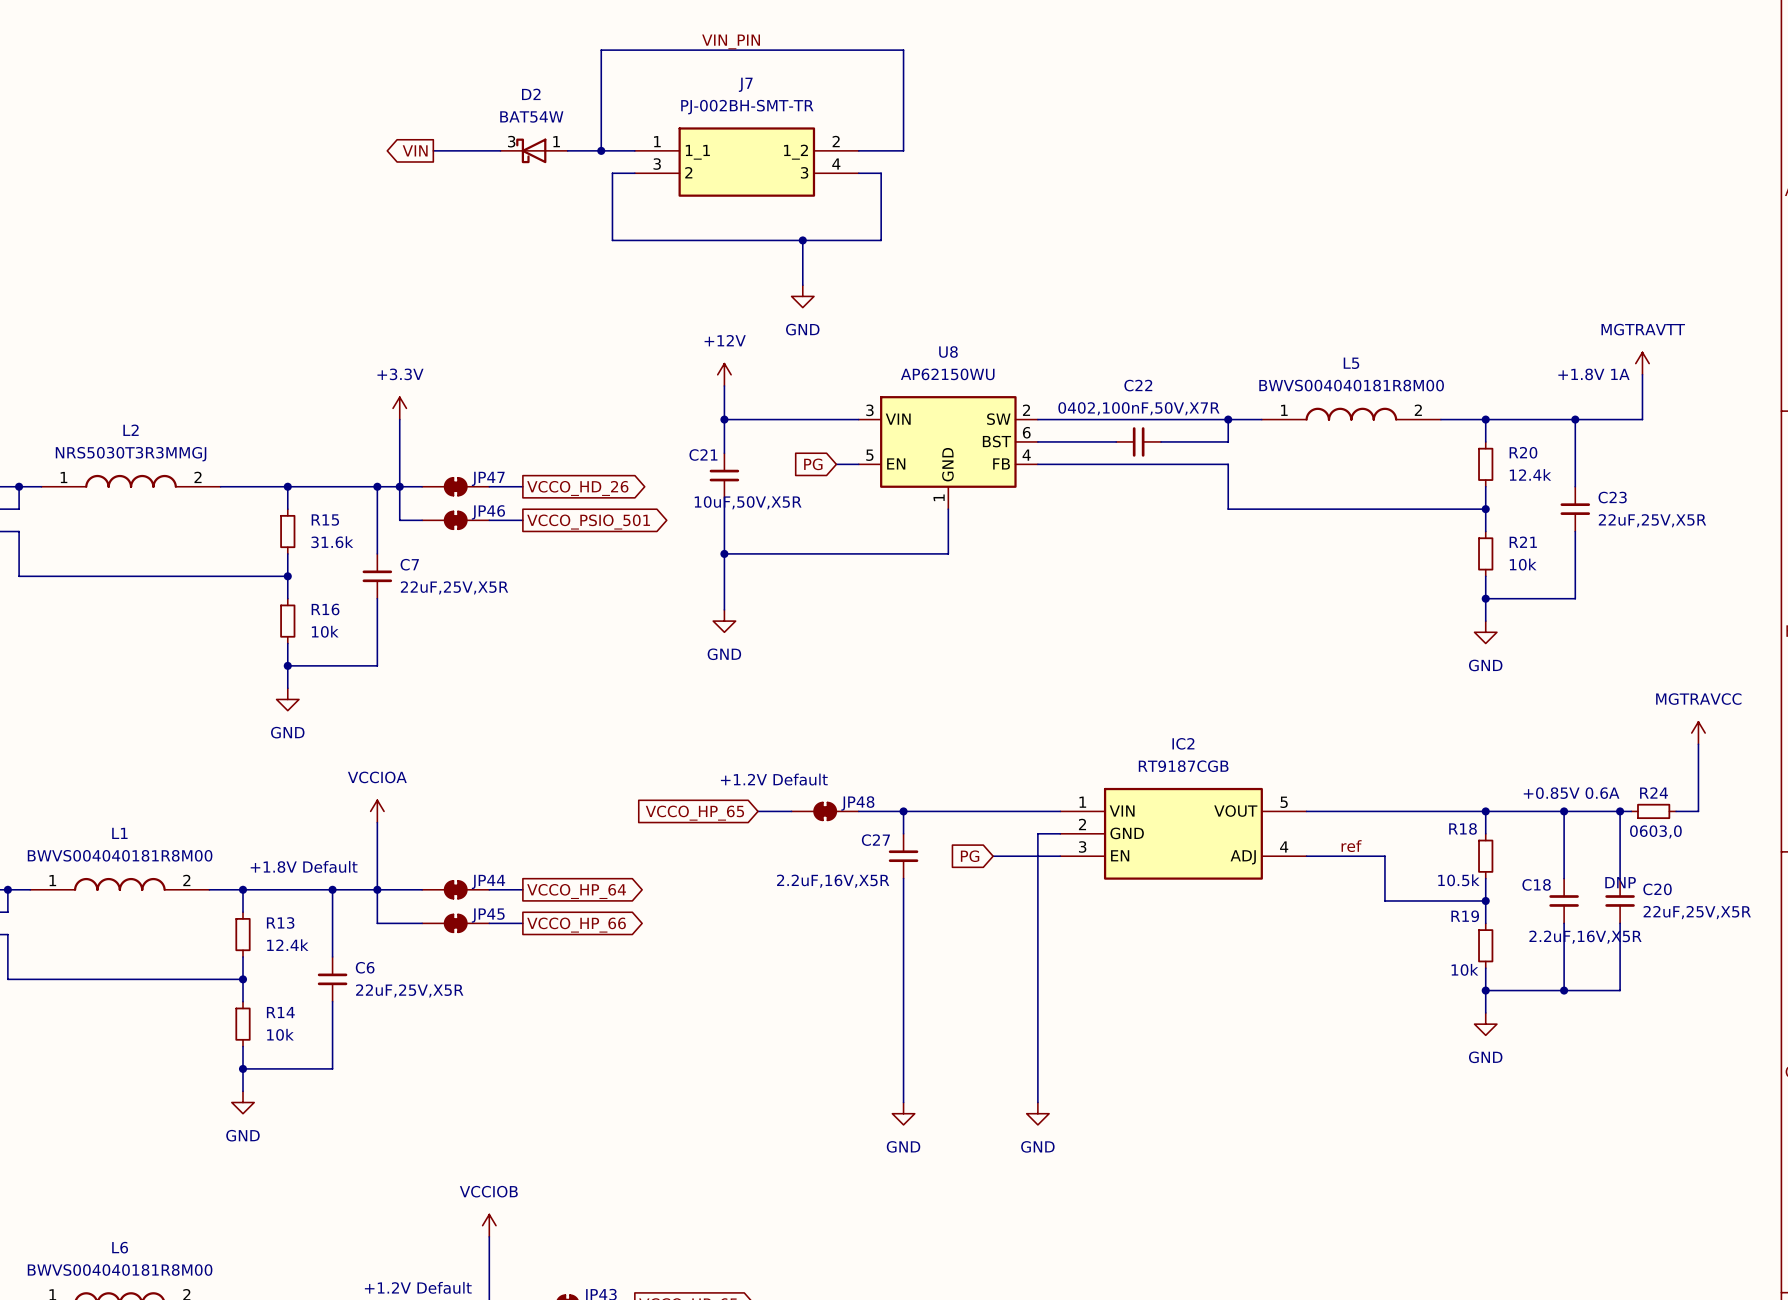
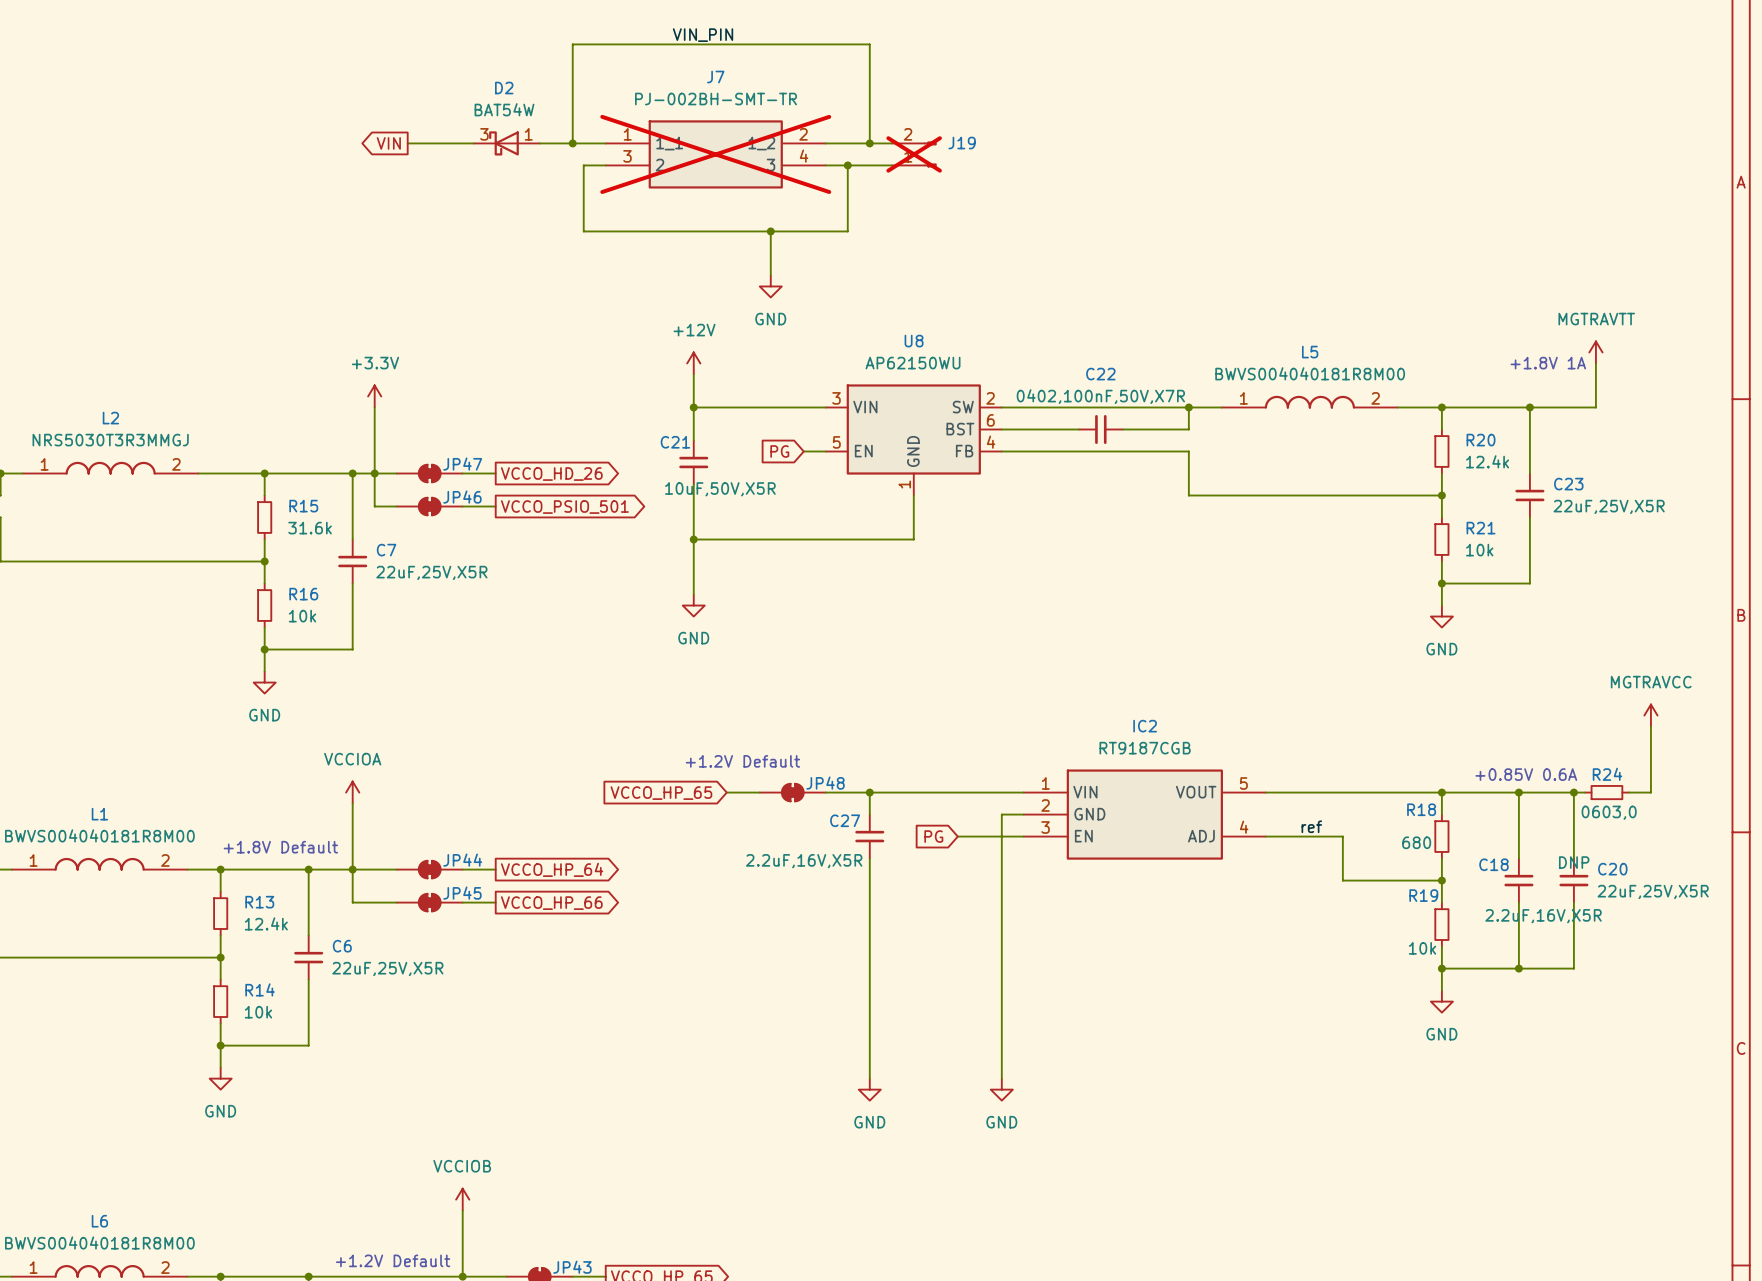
wire: none -> (869, 143) (891, 143)
junction: none -> (869, 143)
J7 do-not-place cross: none -> (715, 154)
J19: none -> (914, 154)
wire: none -> (847, 165) (891, 165)
junction: none -> (847, 165)
R18 value: 10.5k (1458, 880) -> 680 (1416, 842)

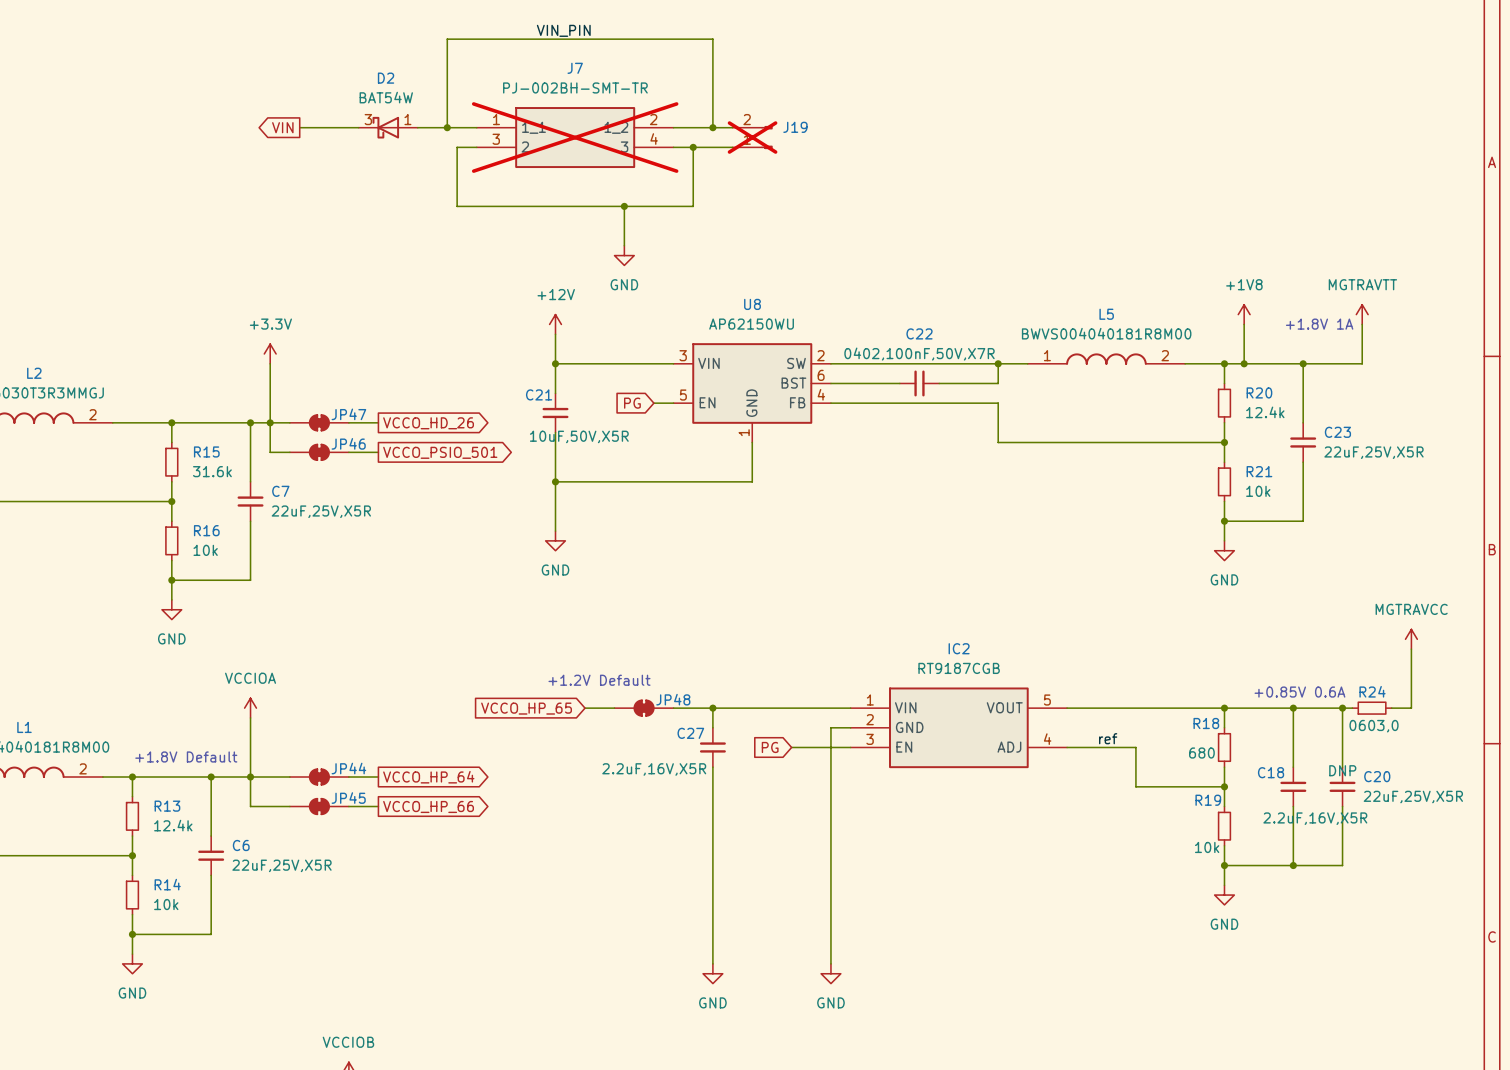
power symbol: none -> +1V8 (1244, 314)
wire: none -> (1244, 324) (1244, 363)
junction: none -> (1244, 363)

